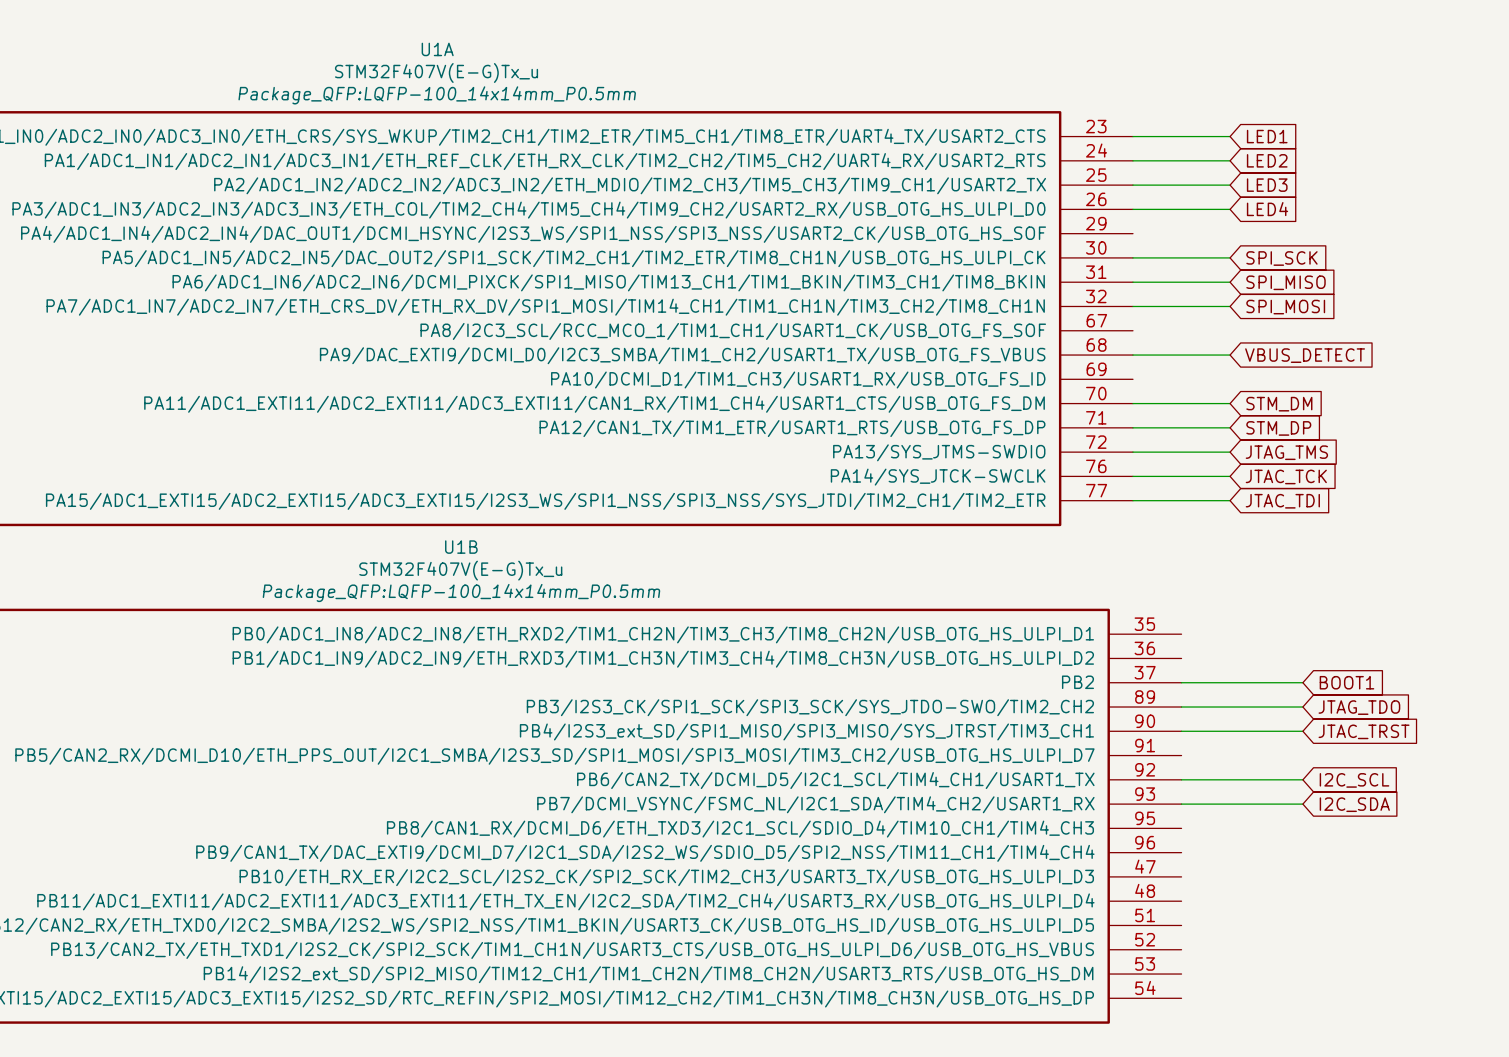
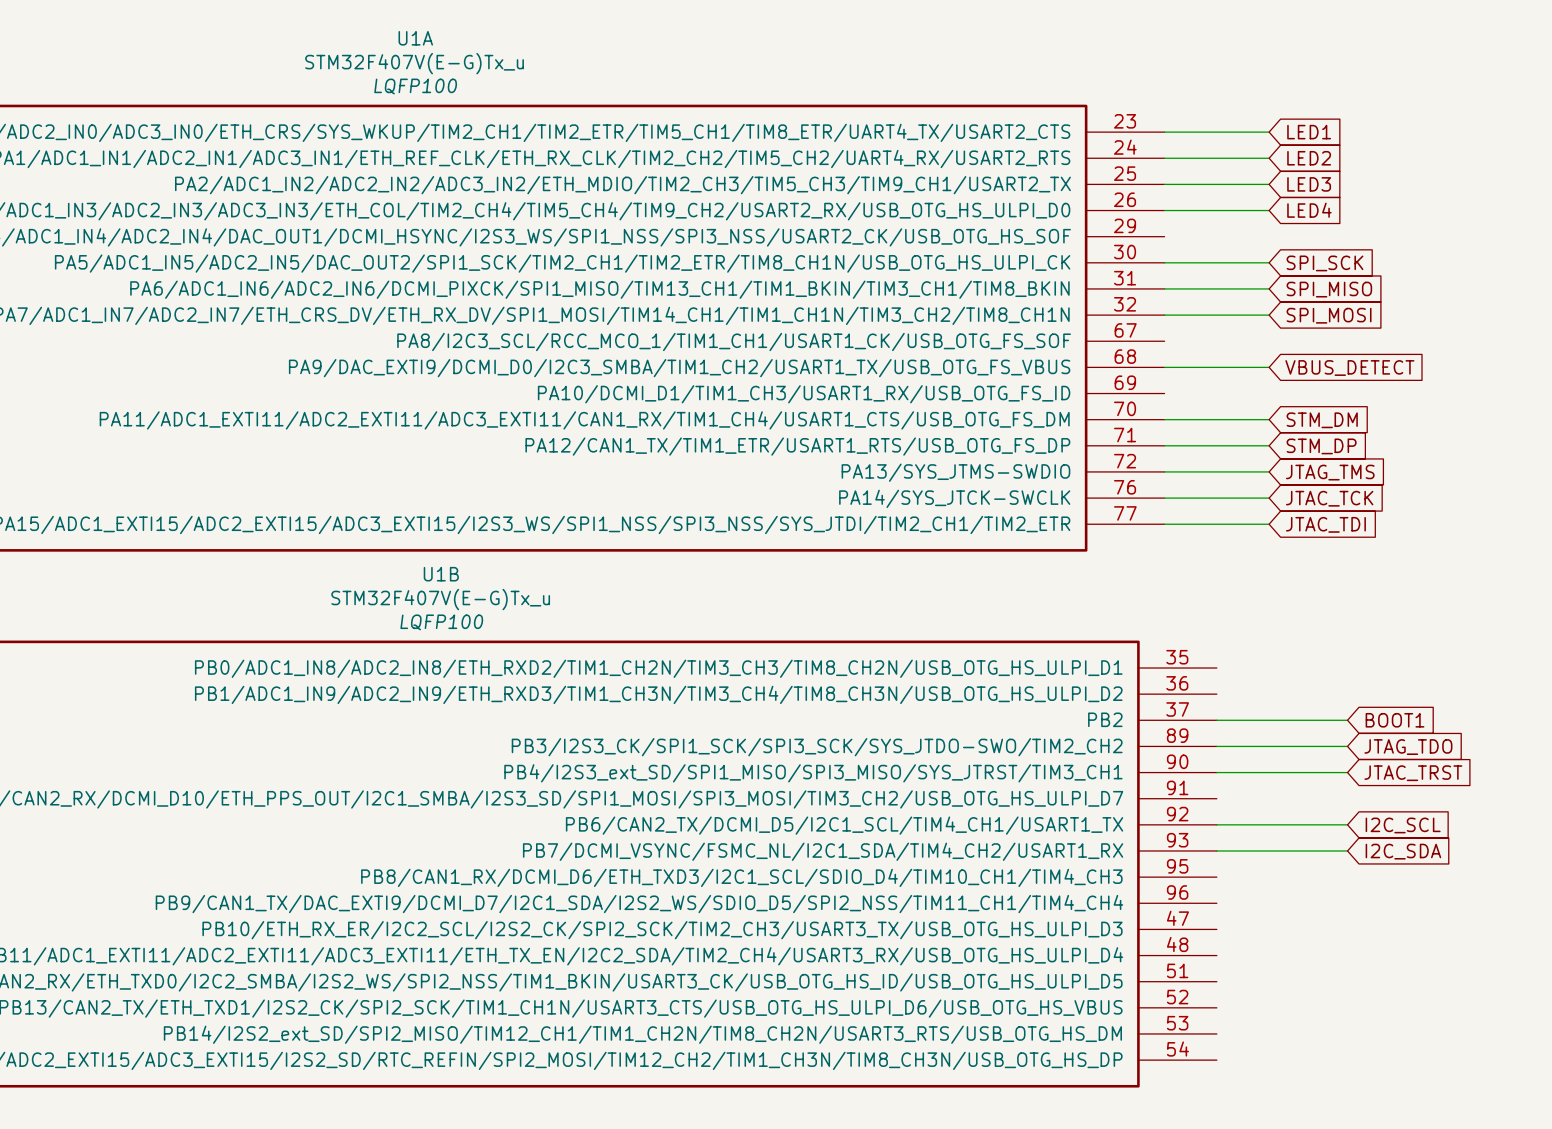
U1A text: Package_QFP:LQFP-100_14x14mm_P0.5mm (437, 95) -> LQFP100 (415, 86)
U1B text: Package_QFP:LQFP-100_14x14mm_P0.5mm (461, 592) -> LQFP100 (441, 622)

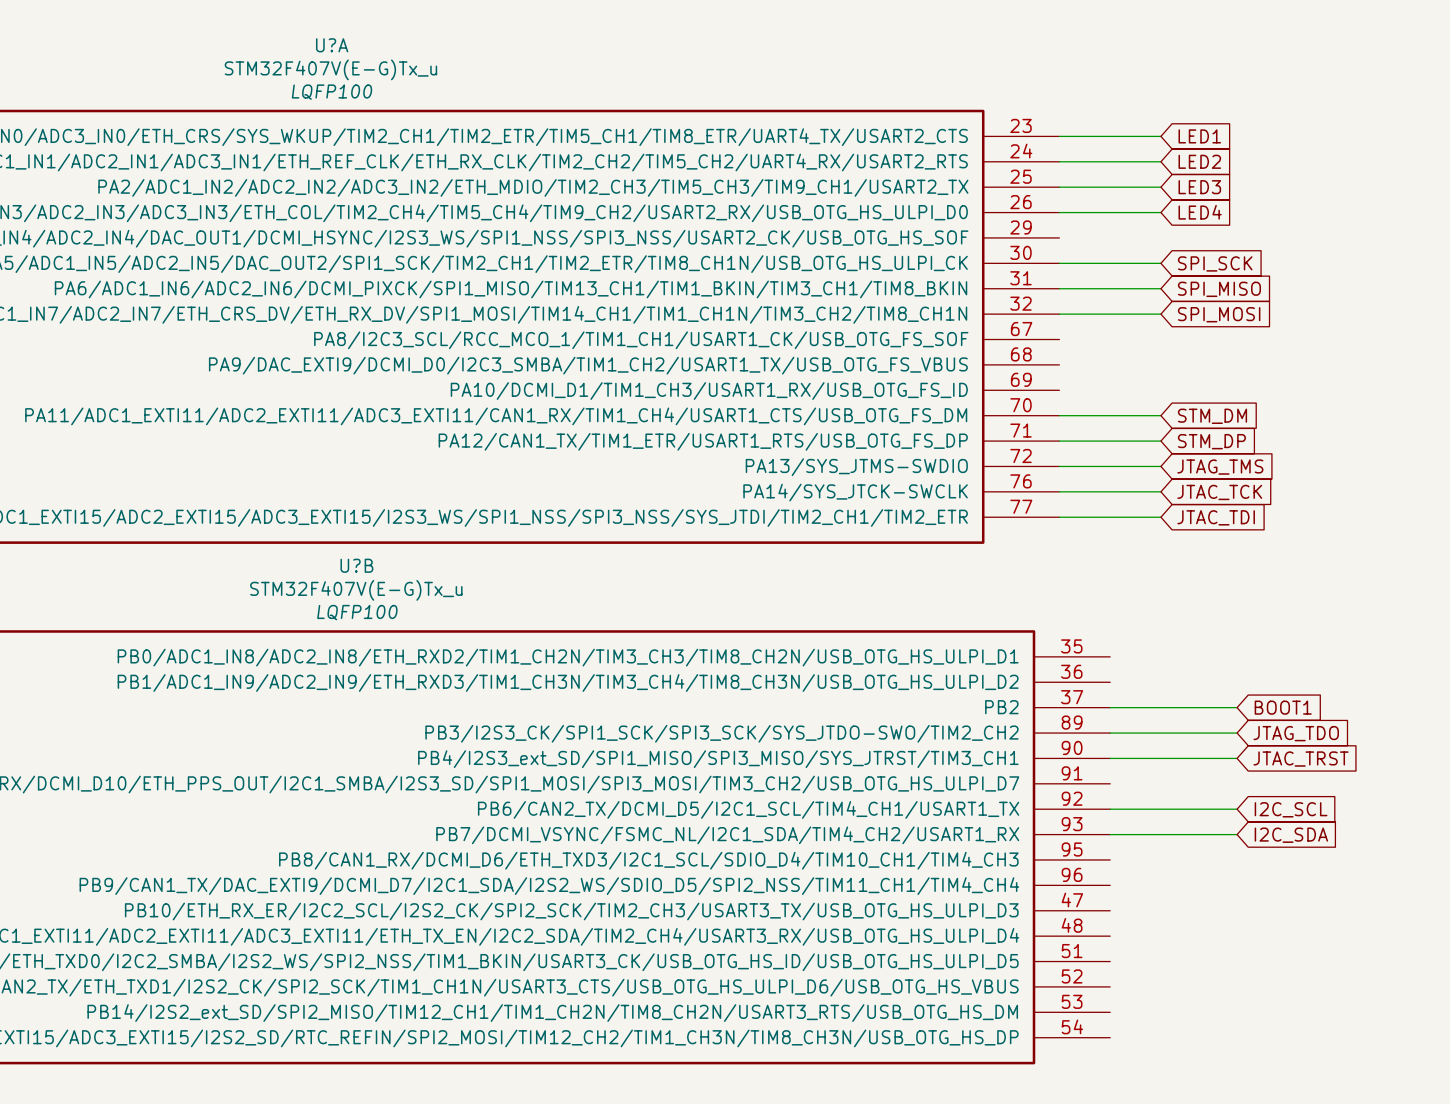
U1A name: U1A (415, 38) -> U?A (332, 45)
wire: (1164, 367) (1269, 367) -> none
global label: VBUS_DETECT (1349, 368) -> none
U1B name: U1B (441, 574) -> U?B (356, 565)

